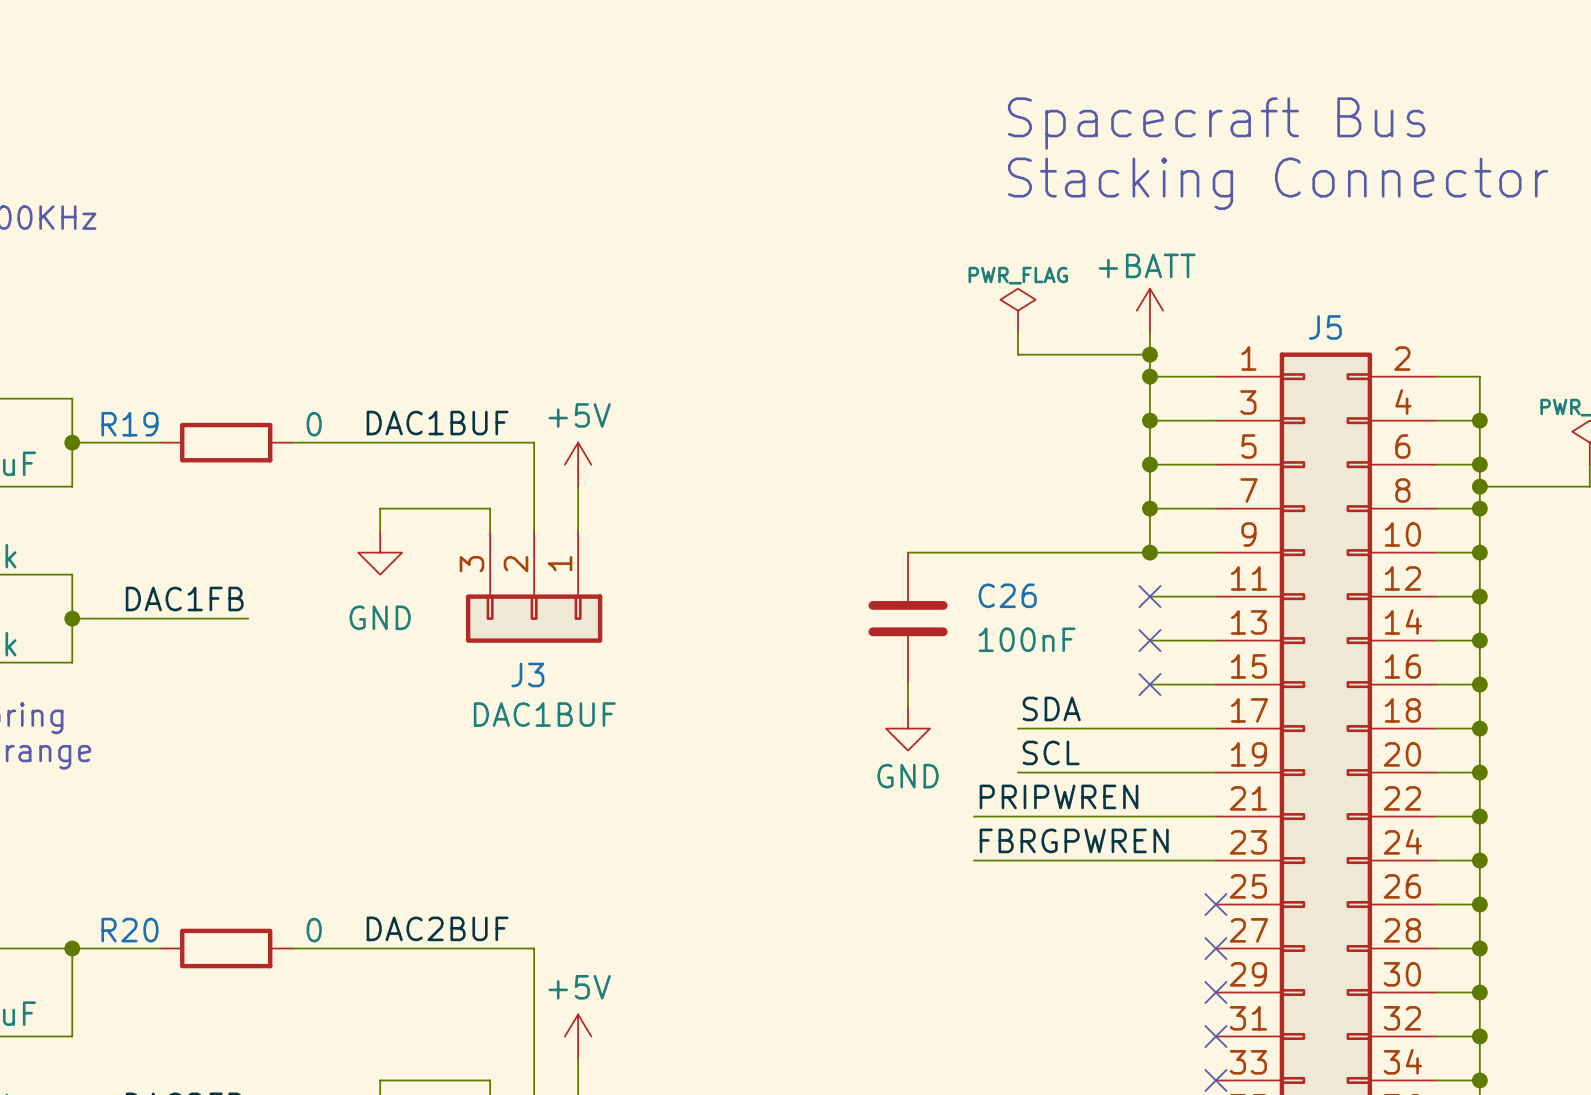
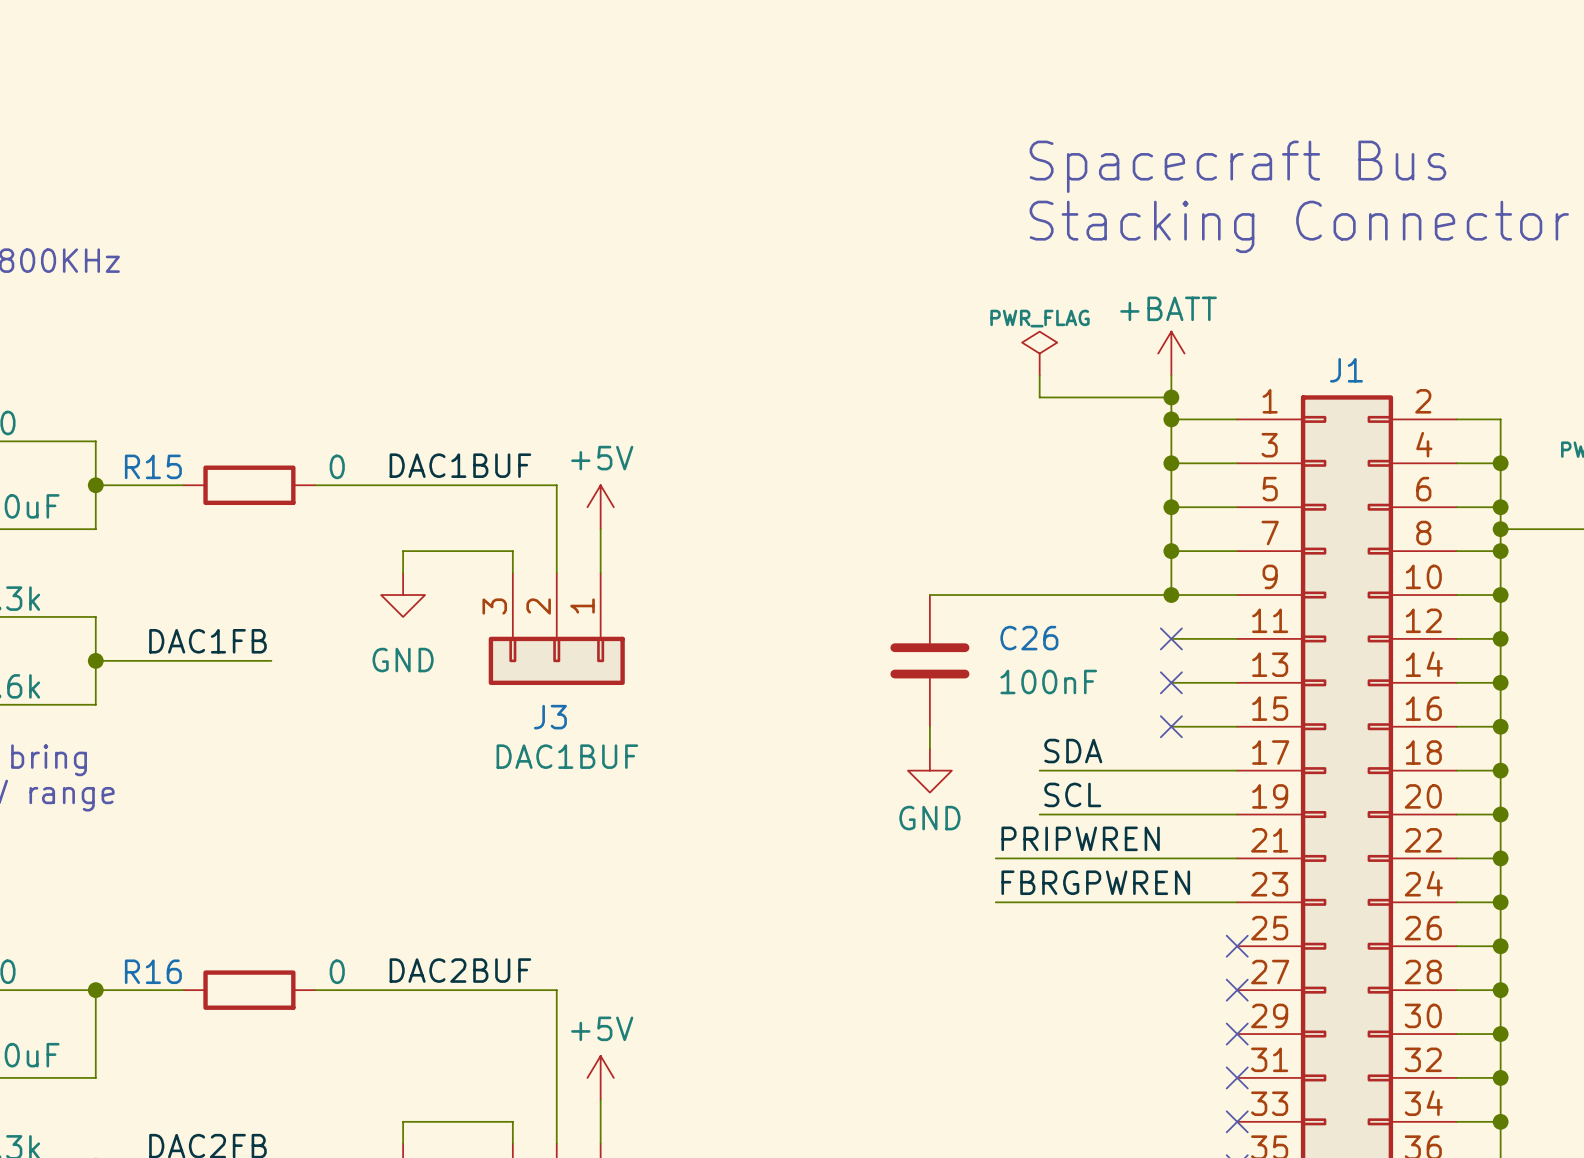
J5 name: J5 (1325, 327) -> J1 (1346, 370)
R19 name: R19 (129, 424) -> R15 (153, 466)
R20 name: R20 (129, 930) -> R16 (153, 971)

